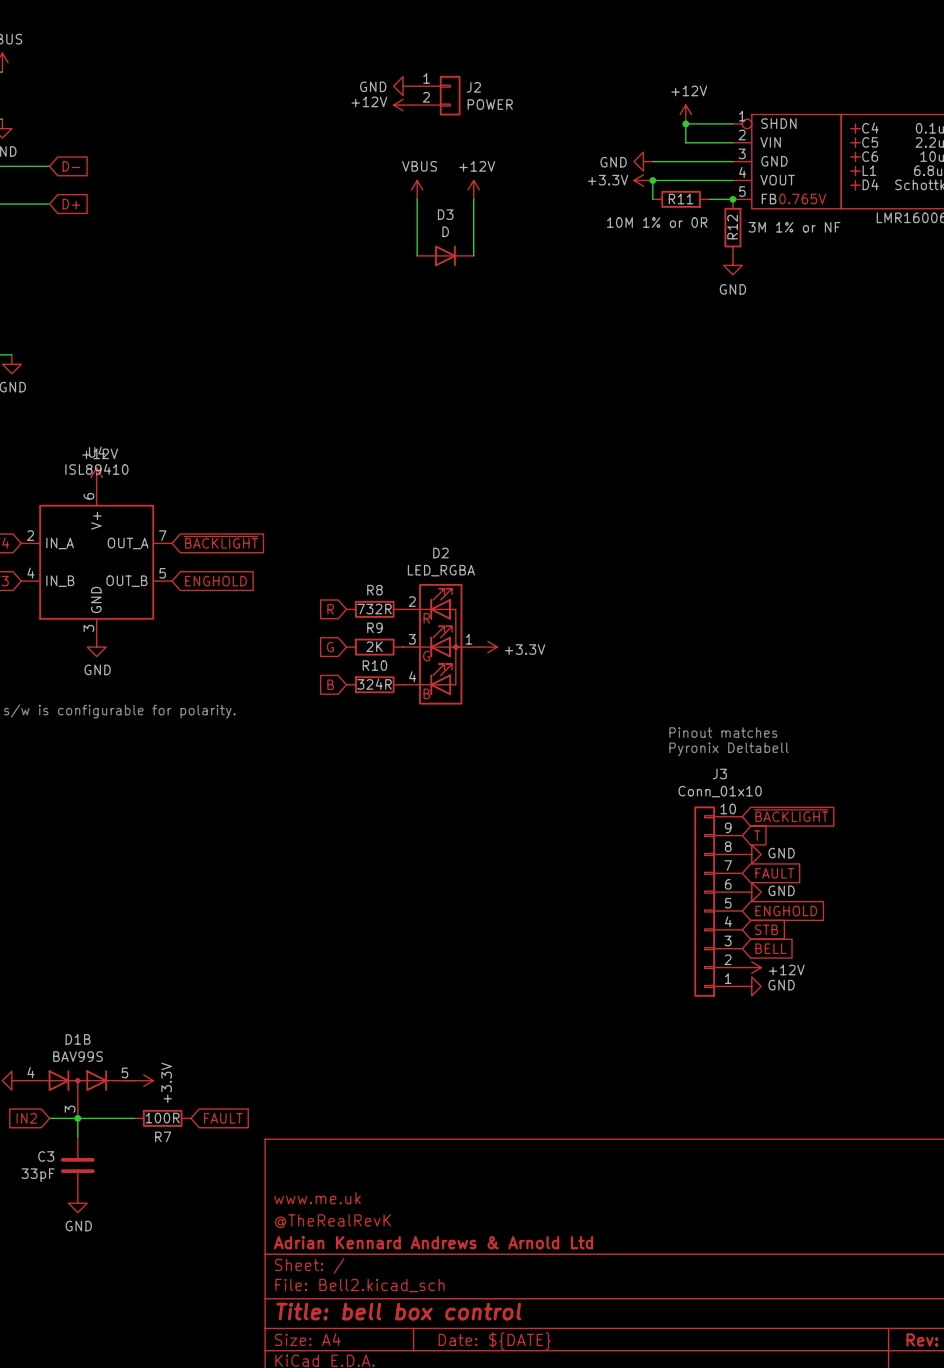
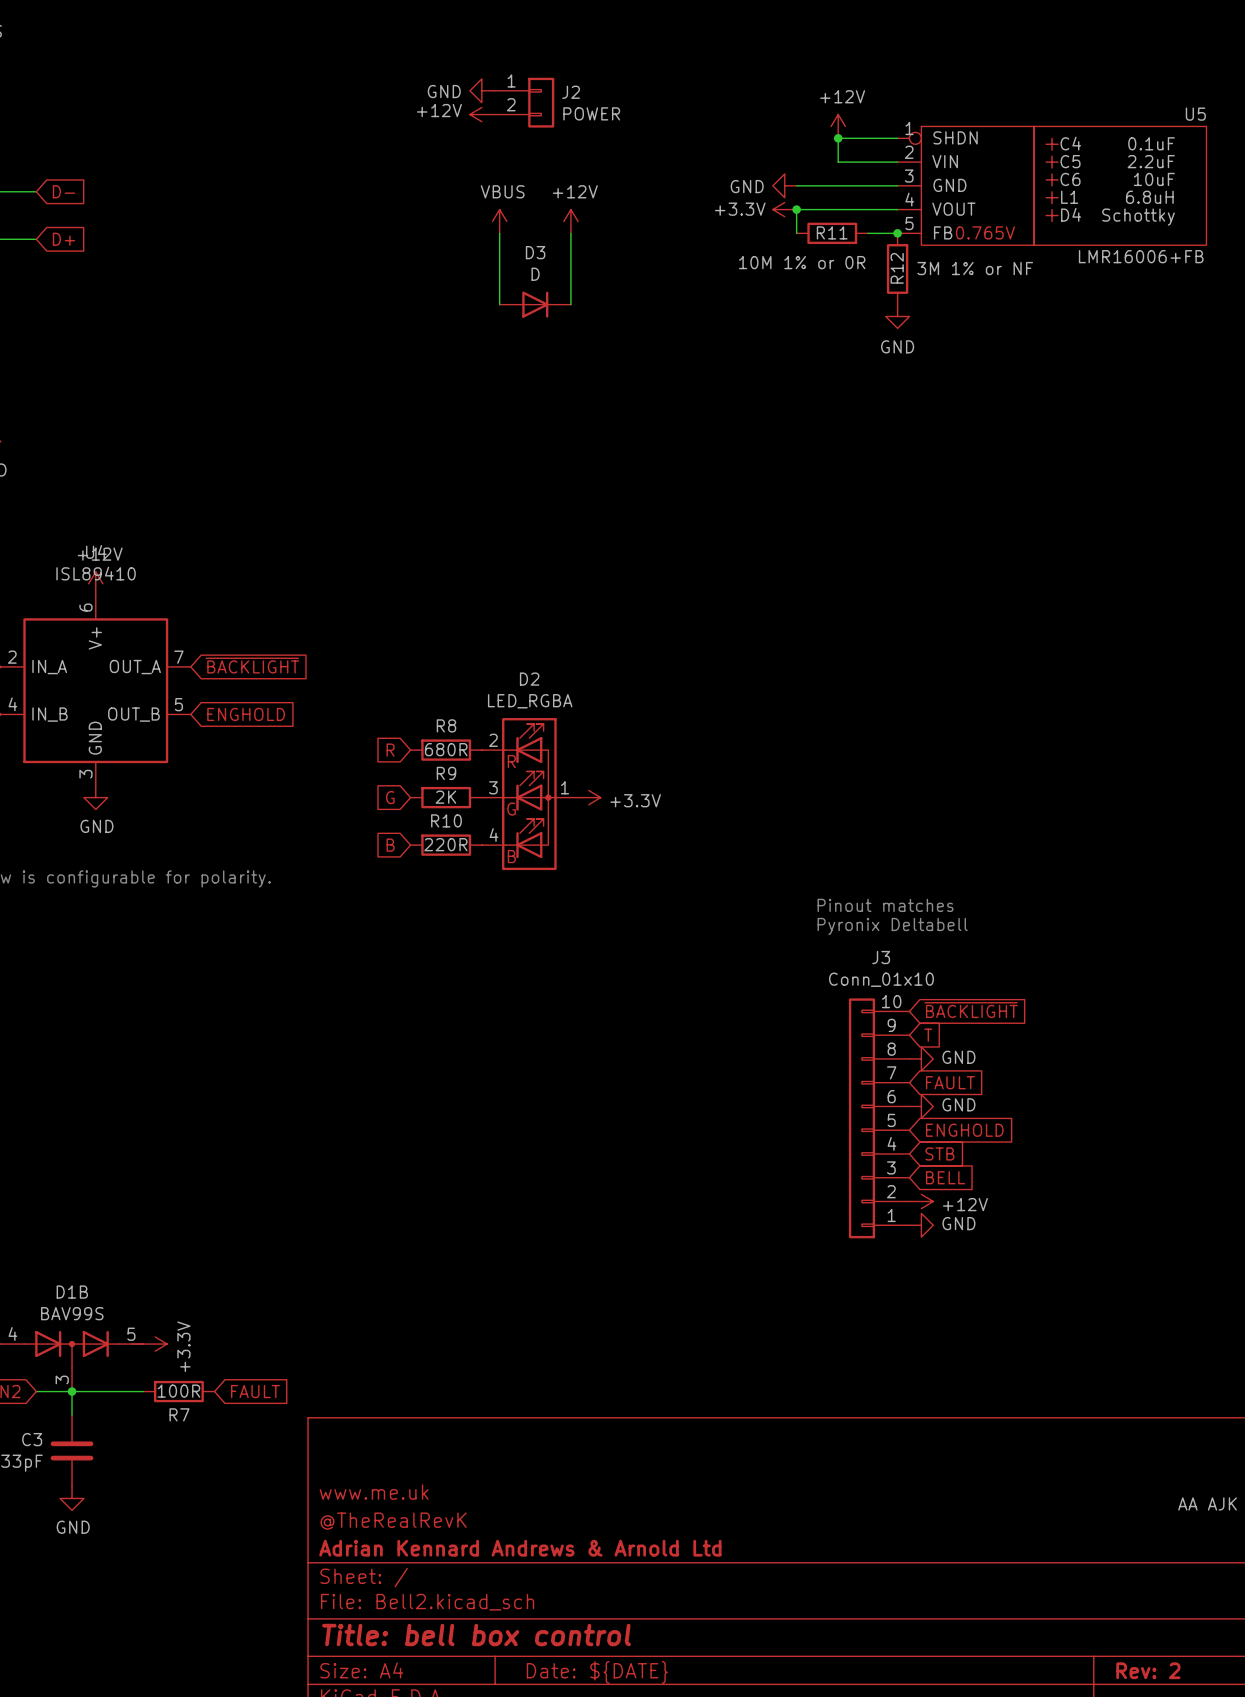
R8 value: 732R (374, 609) -> 680R (446, 749)
R10 value: 324R (374, 684) -> 220R (445, 844)

